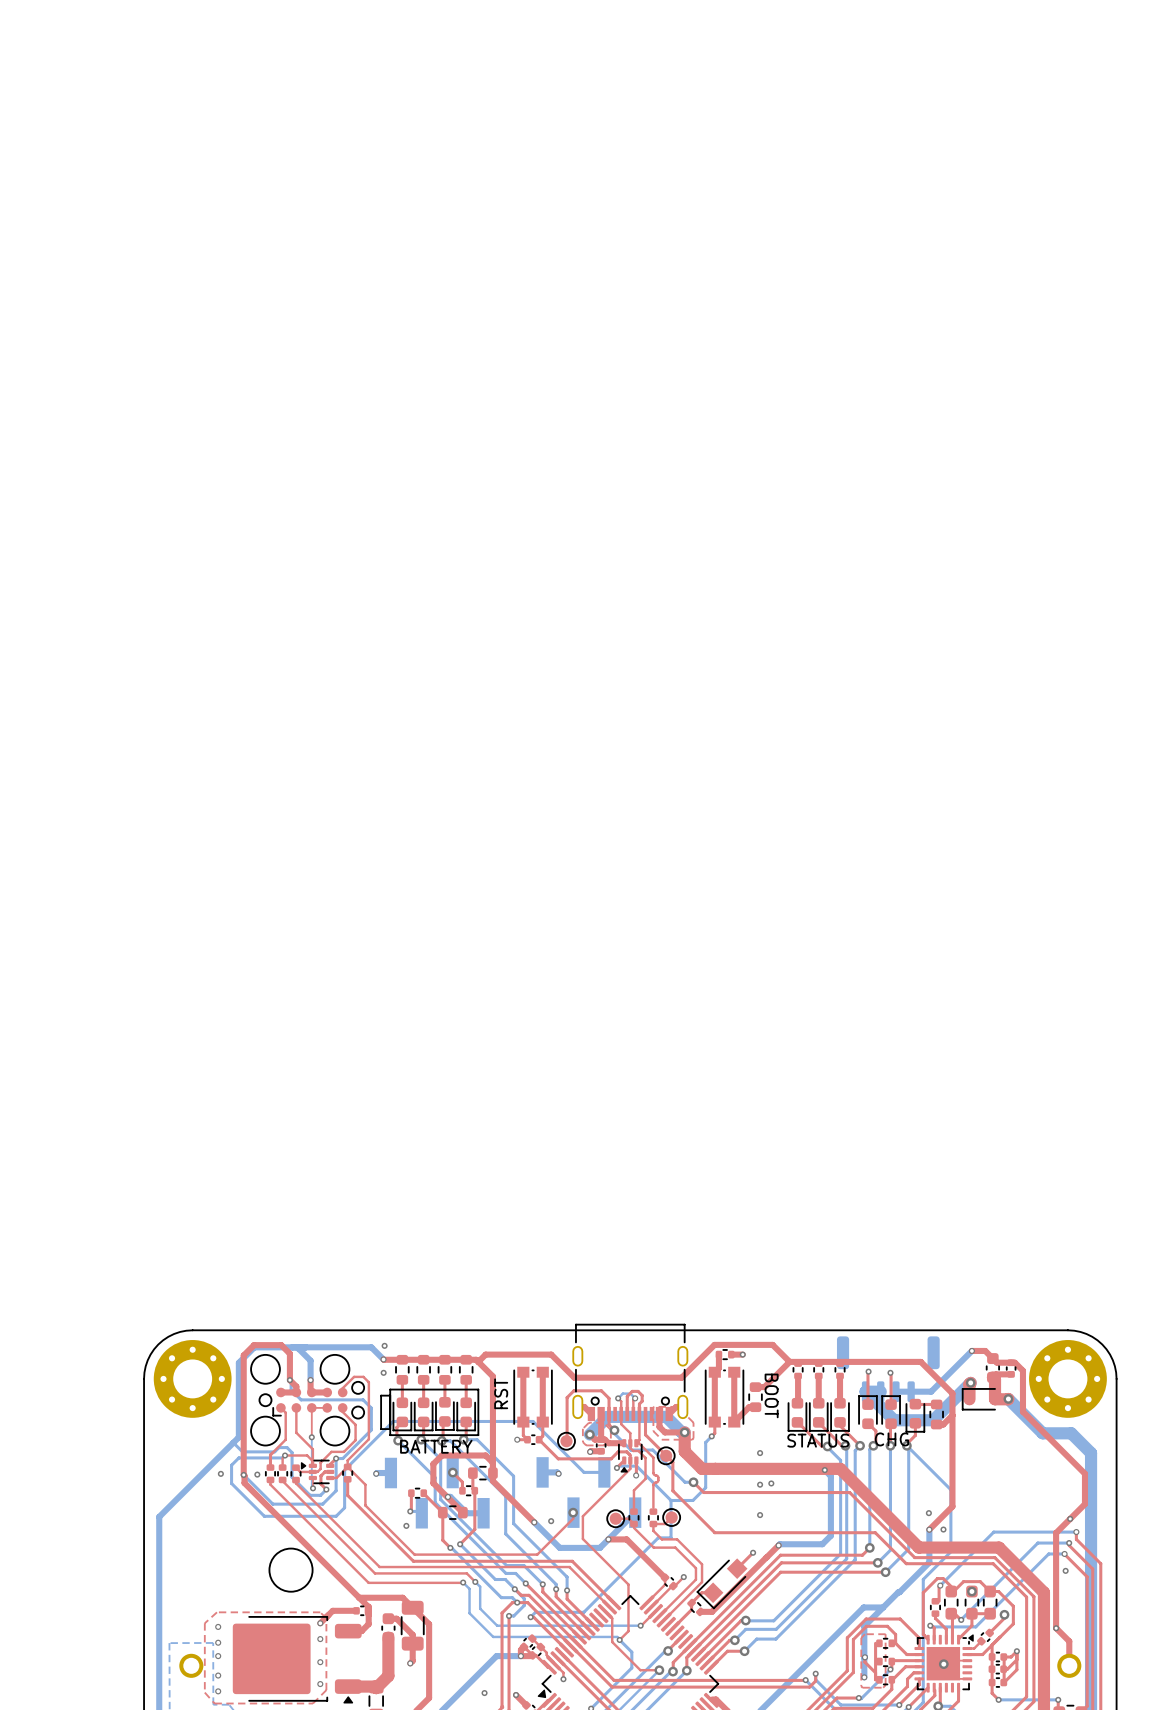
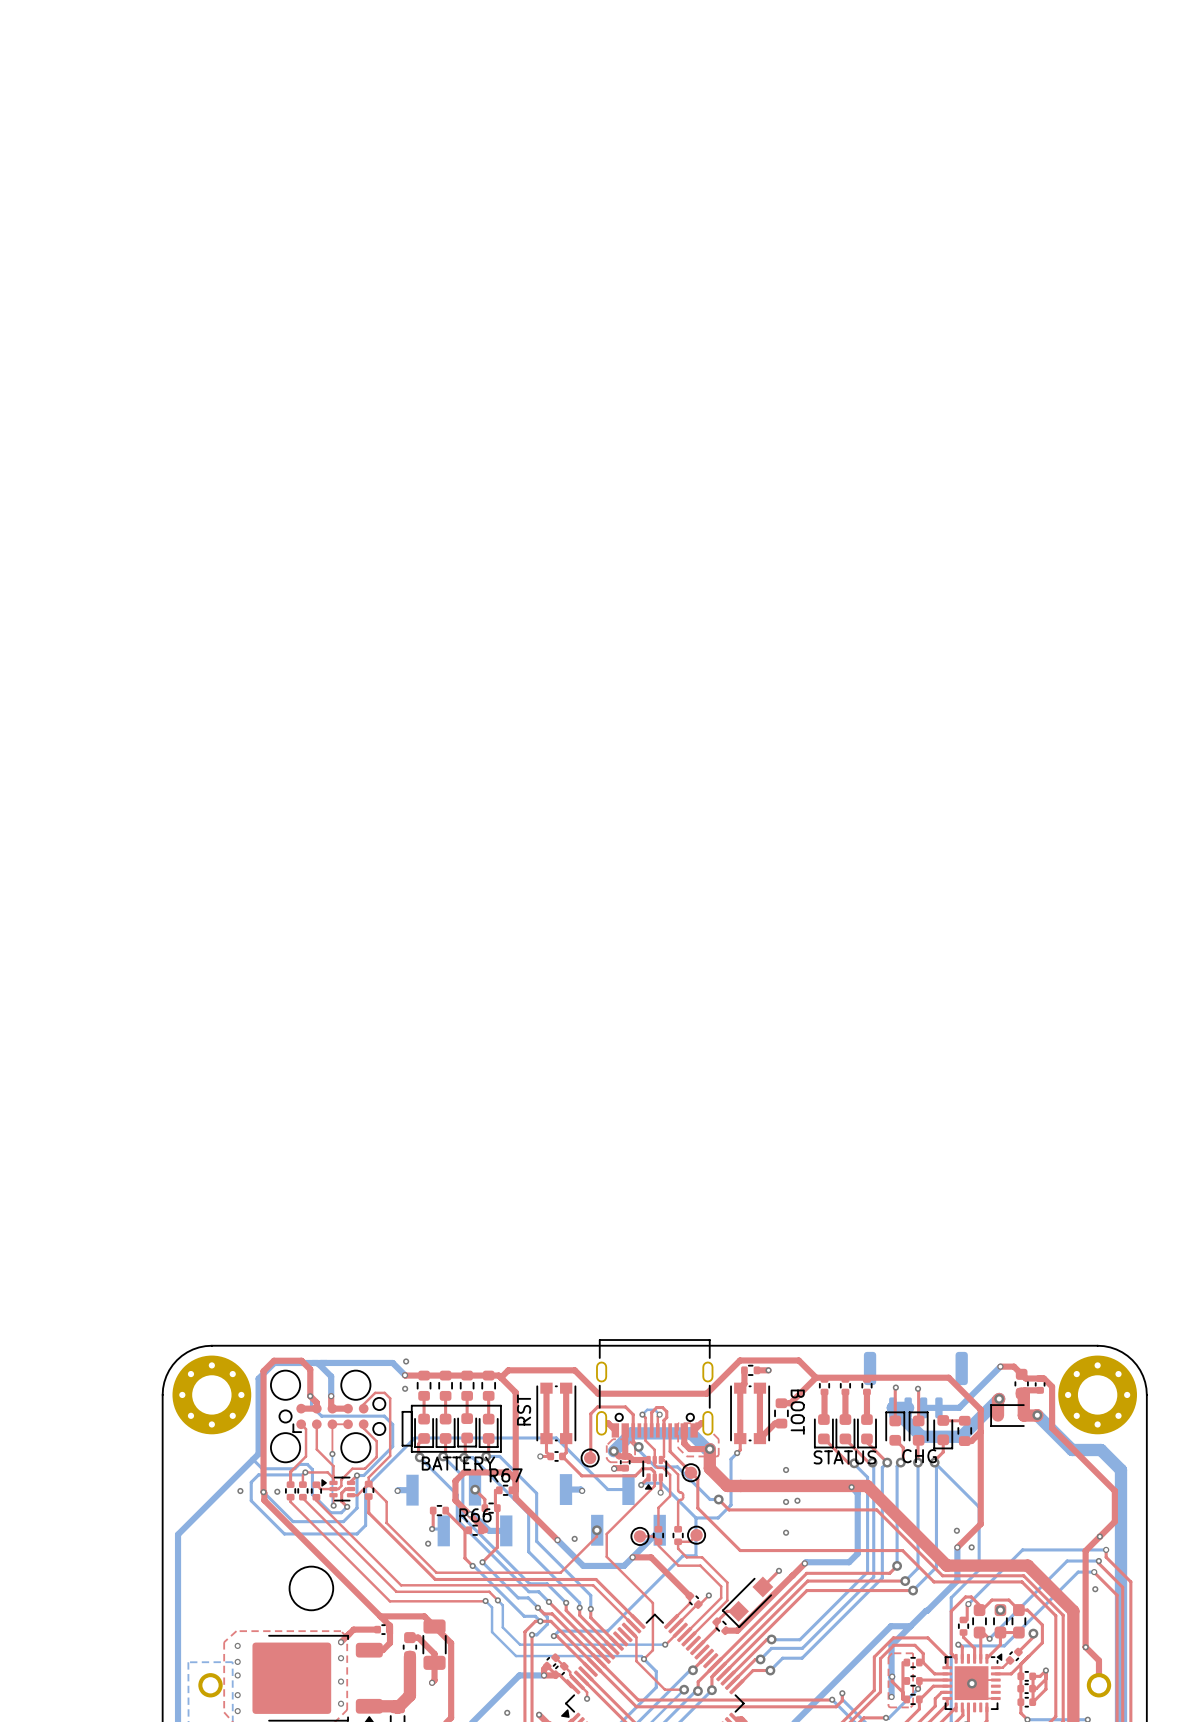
part: (482, 1473) -> none
R67: none -> (505, 1490)
part: (452, 1512) -> none
R66: none -> (475, 1530)

